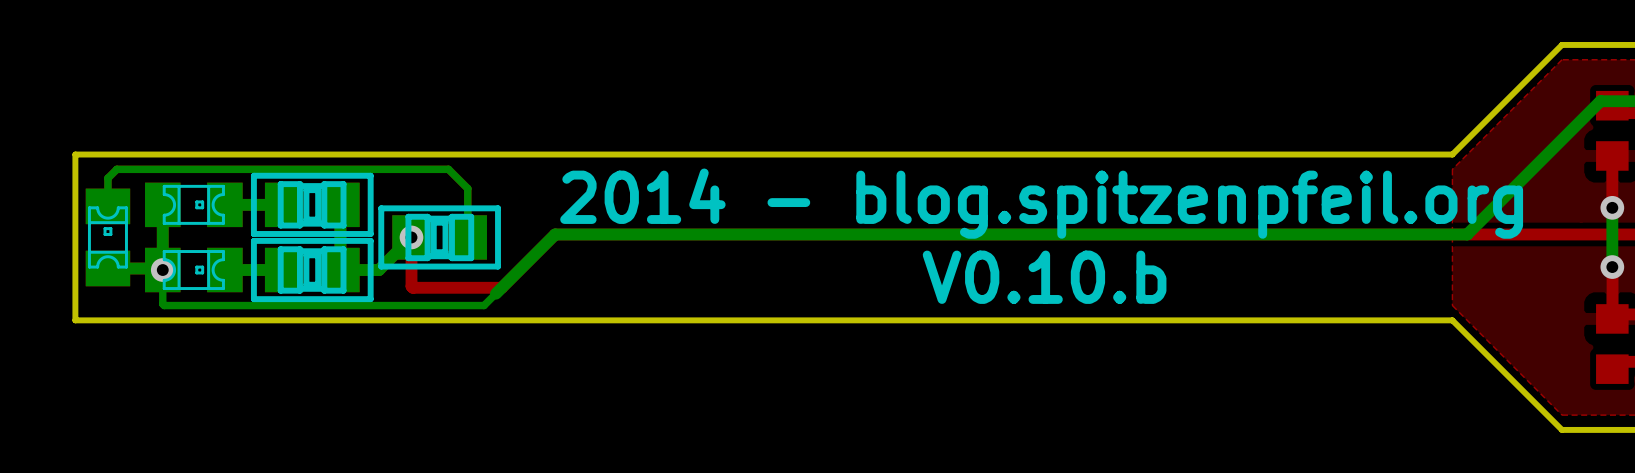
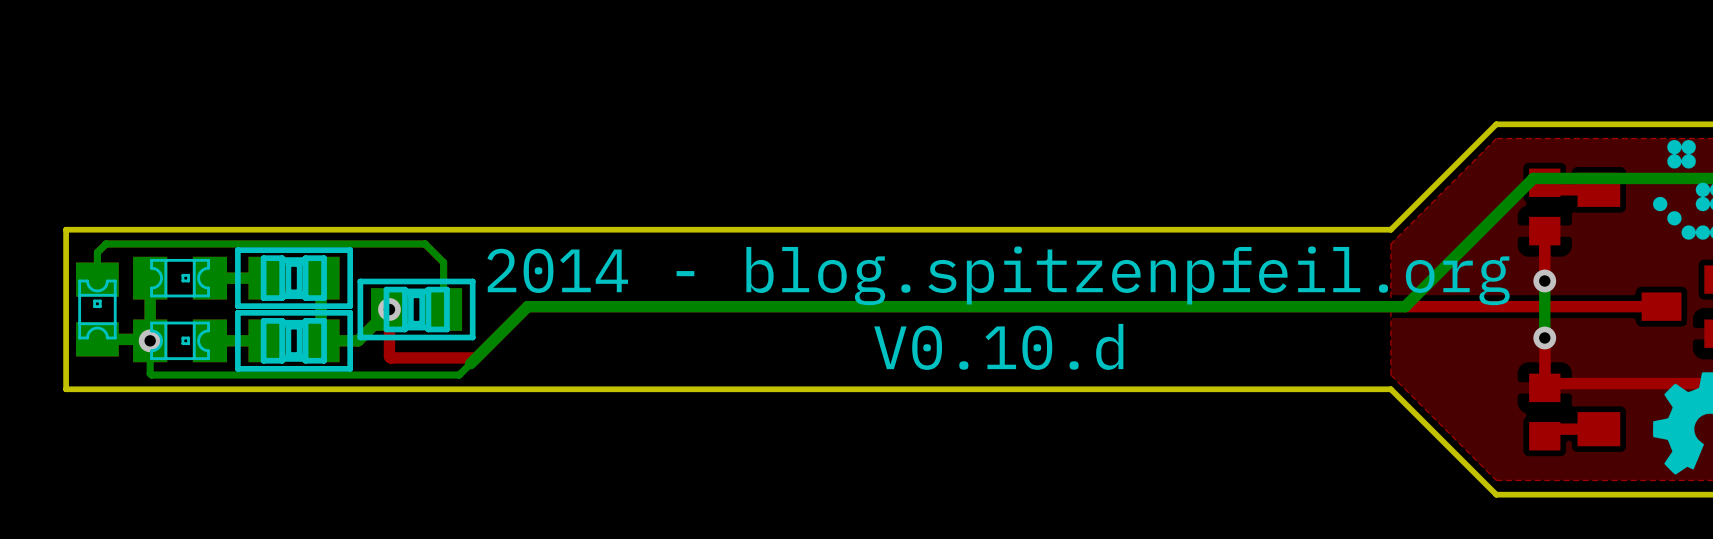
text: V0.10.b (1044, 277) -> V0.10.d (998, 346)

